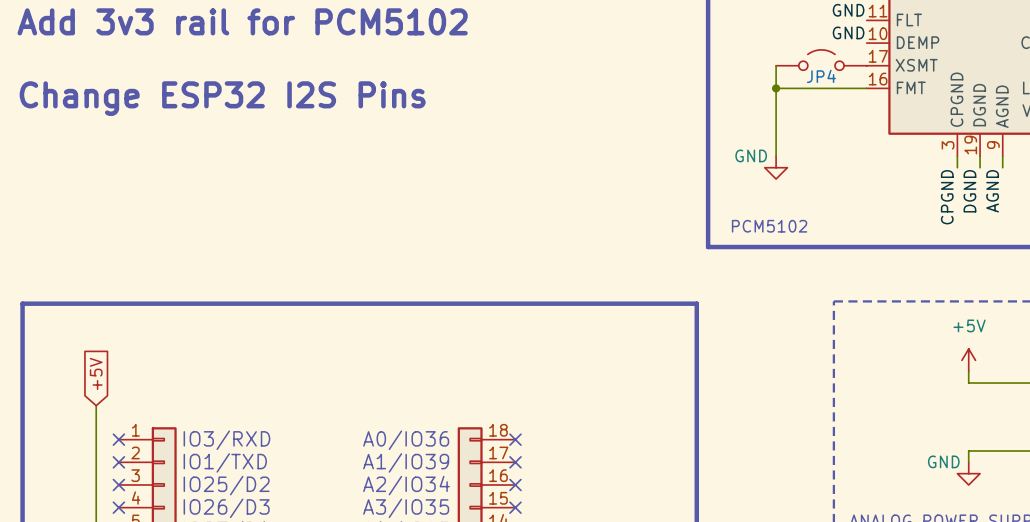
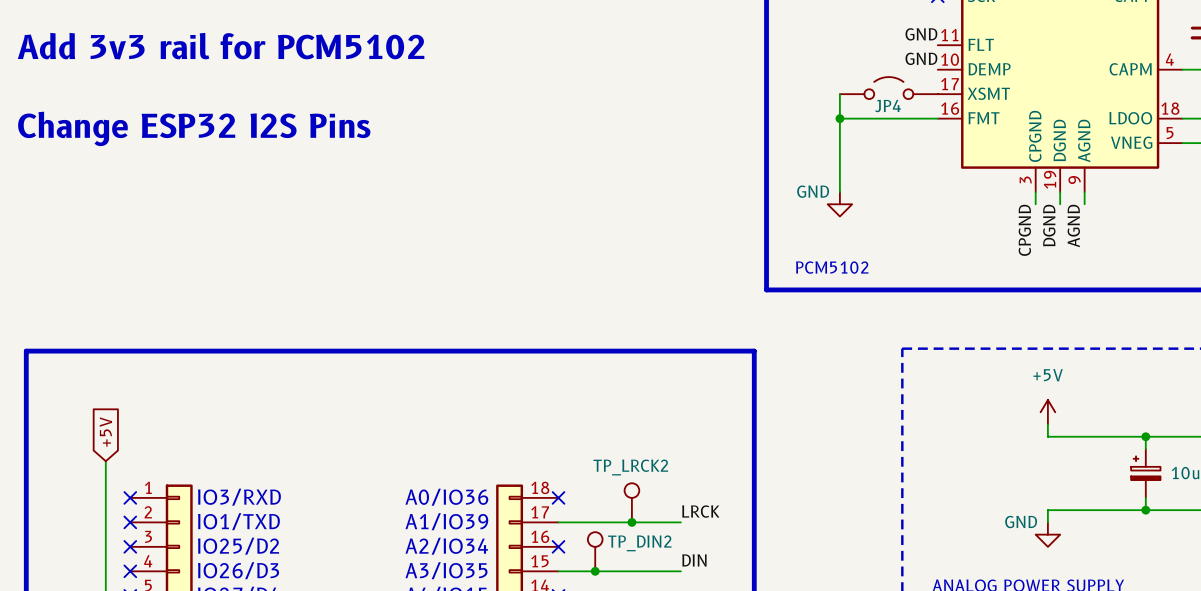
TP_LRCK2: none -> (631, 502)
label: none -> LRCK (700, 511)
wire: none -> (558, 522) (680, 522)
no-connect mark: (515, 462) -> none
junction: none -> (631, 522)
TP_DIN2: none -> (595, 551)
label: none -> DIN (694, 560)
wire: none -> (558, 571) (680, 571)
no-connect mark: (515, 507) -> none
junction: none -> (595, 571)

